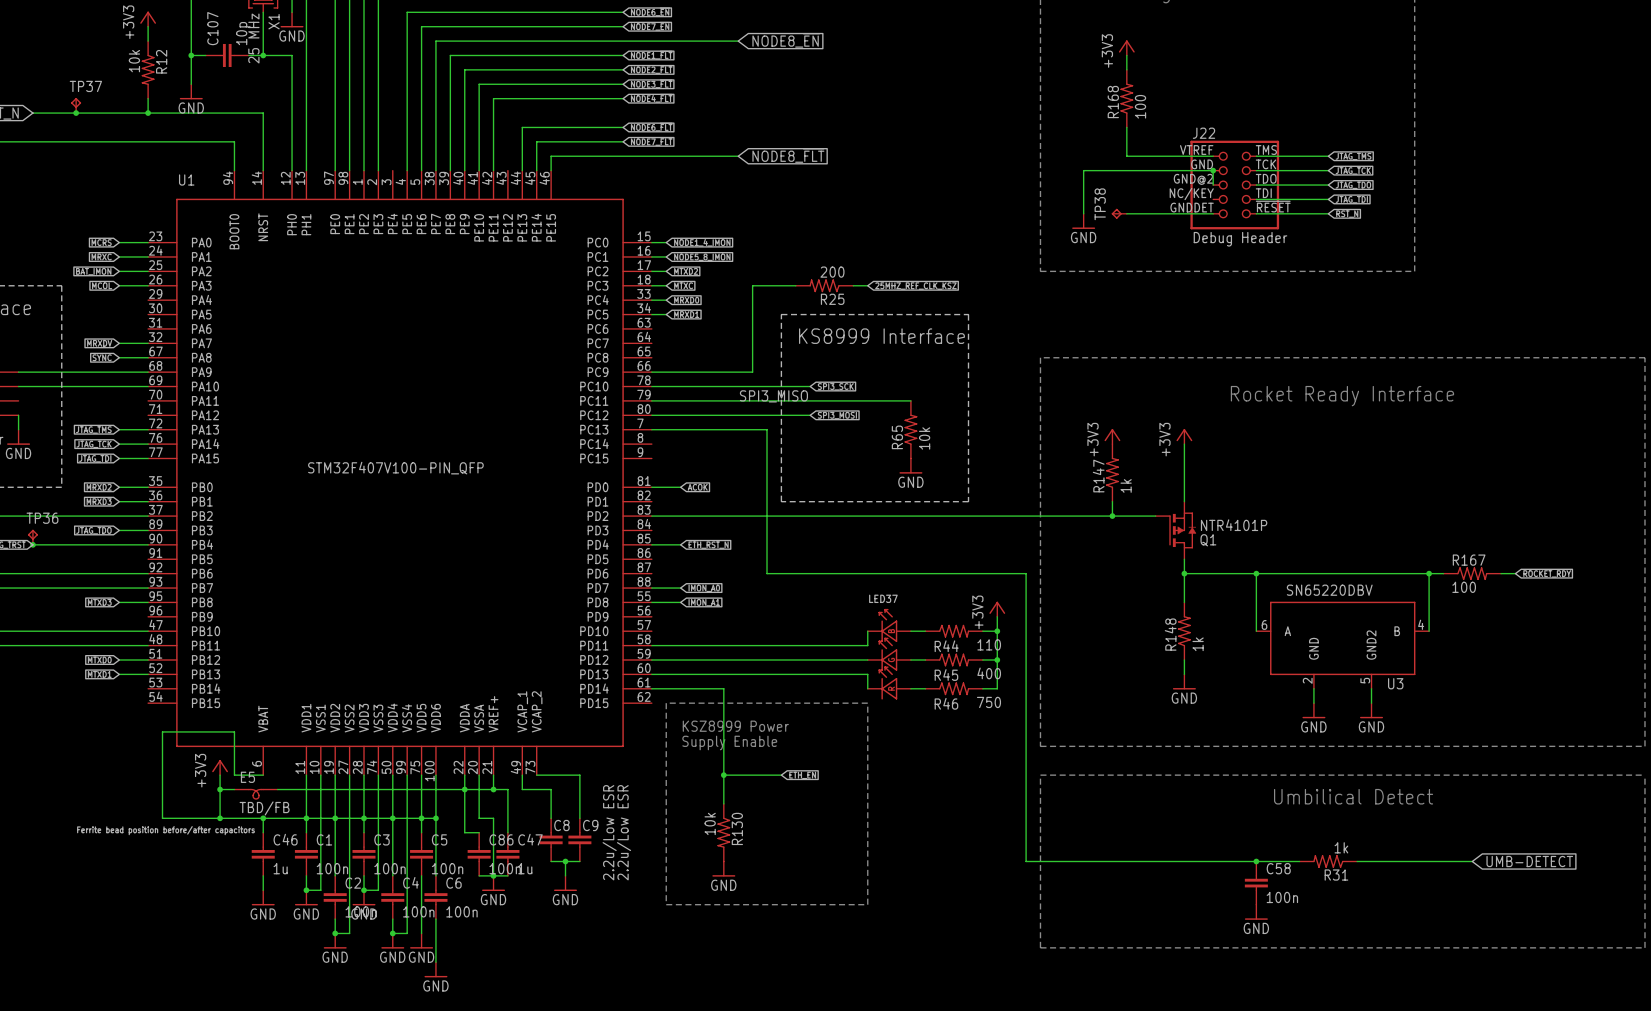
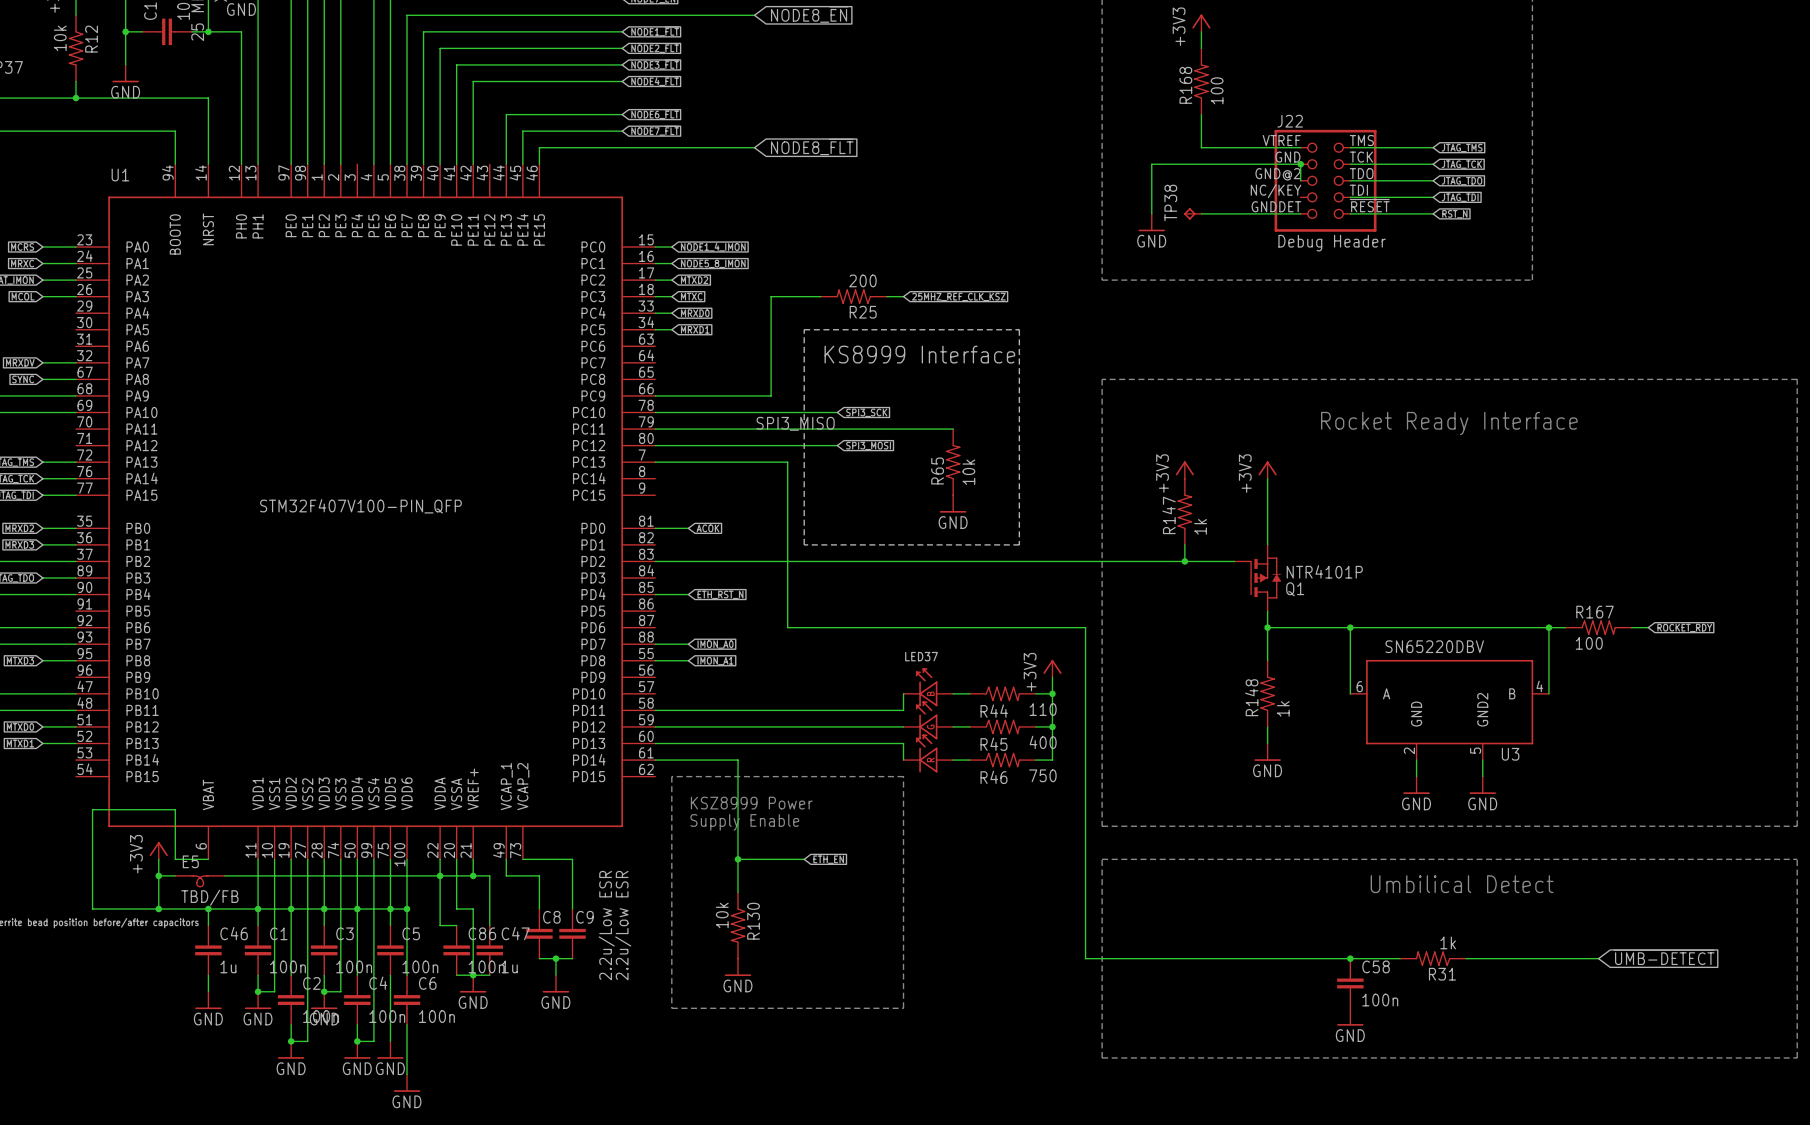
global label: UMB-DETECT (1529, 861) -> ~{UMB-DETECT} (1664, 957)

